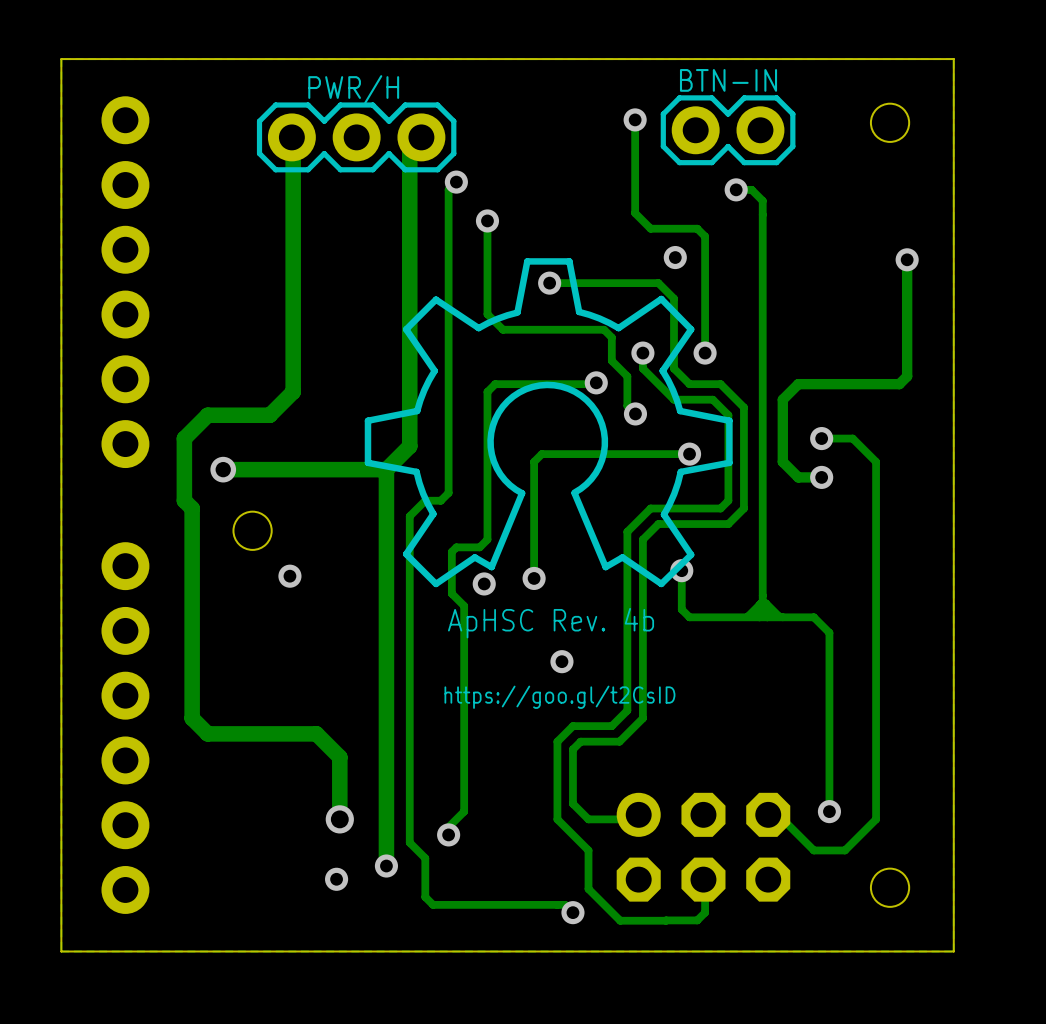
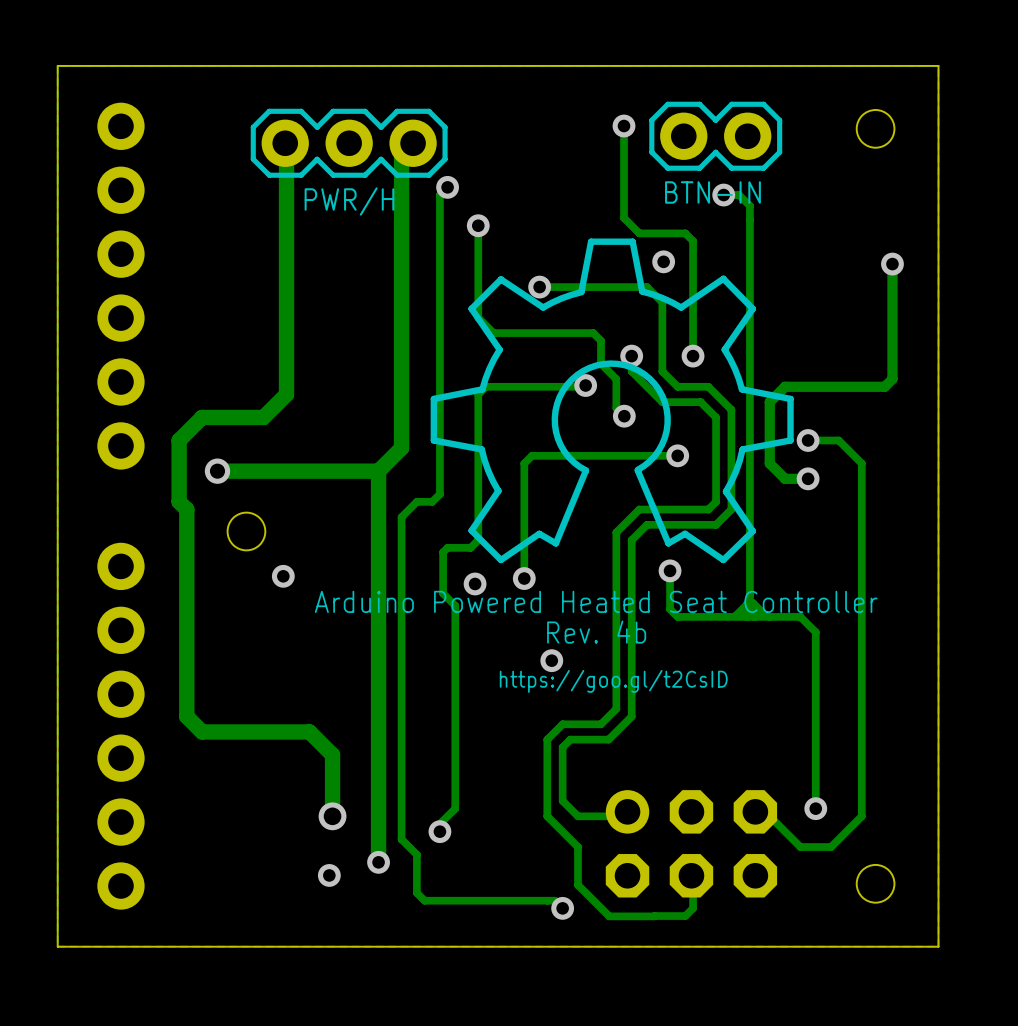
BTN-IN name position: BTN-IN (728, 80) -> BTN-IN (712, 192)
PWR/H name position: PWR/H (353, 89) -> PWR/H (349, 201)
drawing position: (548, 422) -> (612, 400)
text: none -> Arduino Powered Heated Seat Controller (596, 601)
text: ApHSC Rev. 4b (551, 623) -> Rev. 4b (596, 632)
text position: https://goo.gl/t2CsID (559, 697) -> https://goo.gl/t2CsID (613, 681)

